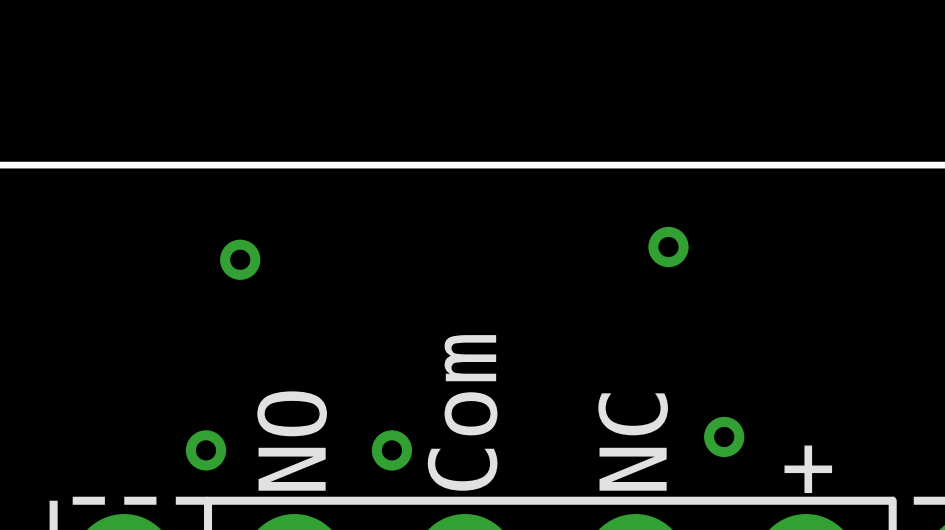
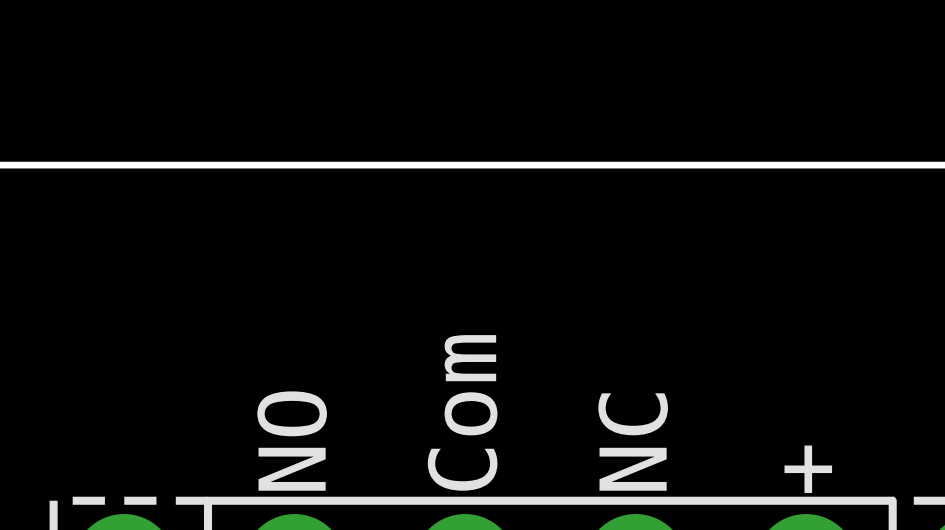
via: (668, 247) -> none
via: (240, 259) -> none
via: (724, 436) -> none
via: (206, 450) -> none
via: (391, 450) -> none

